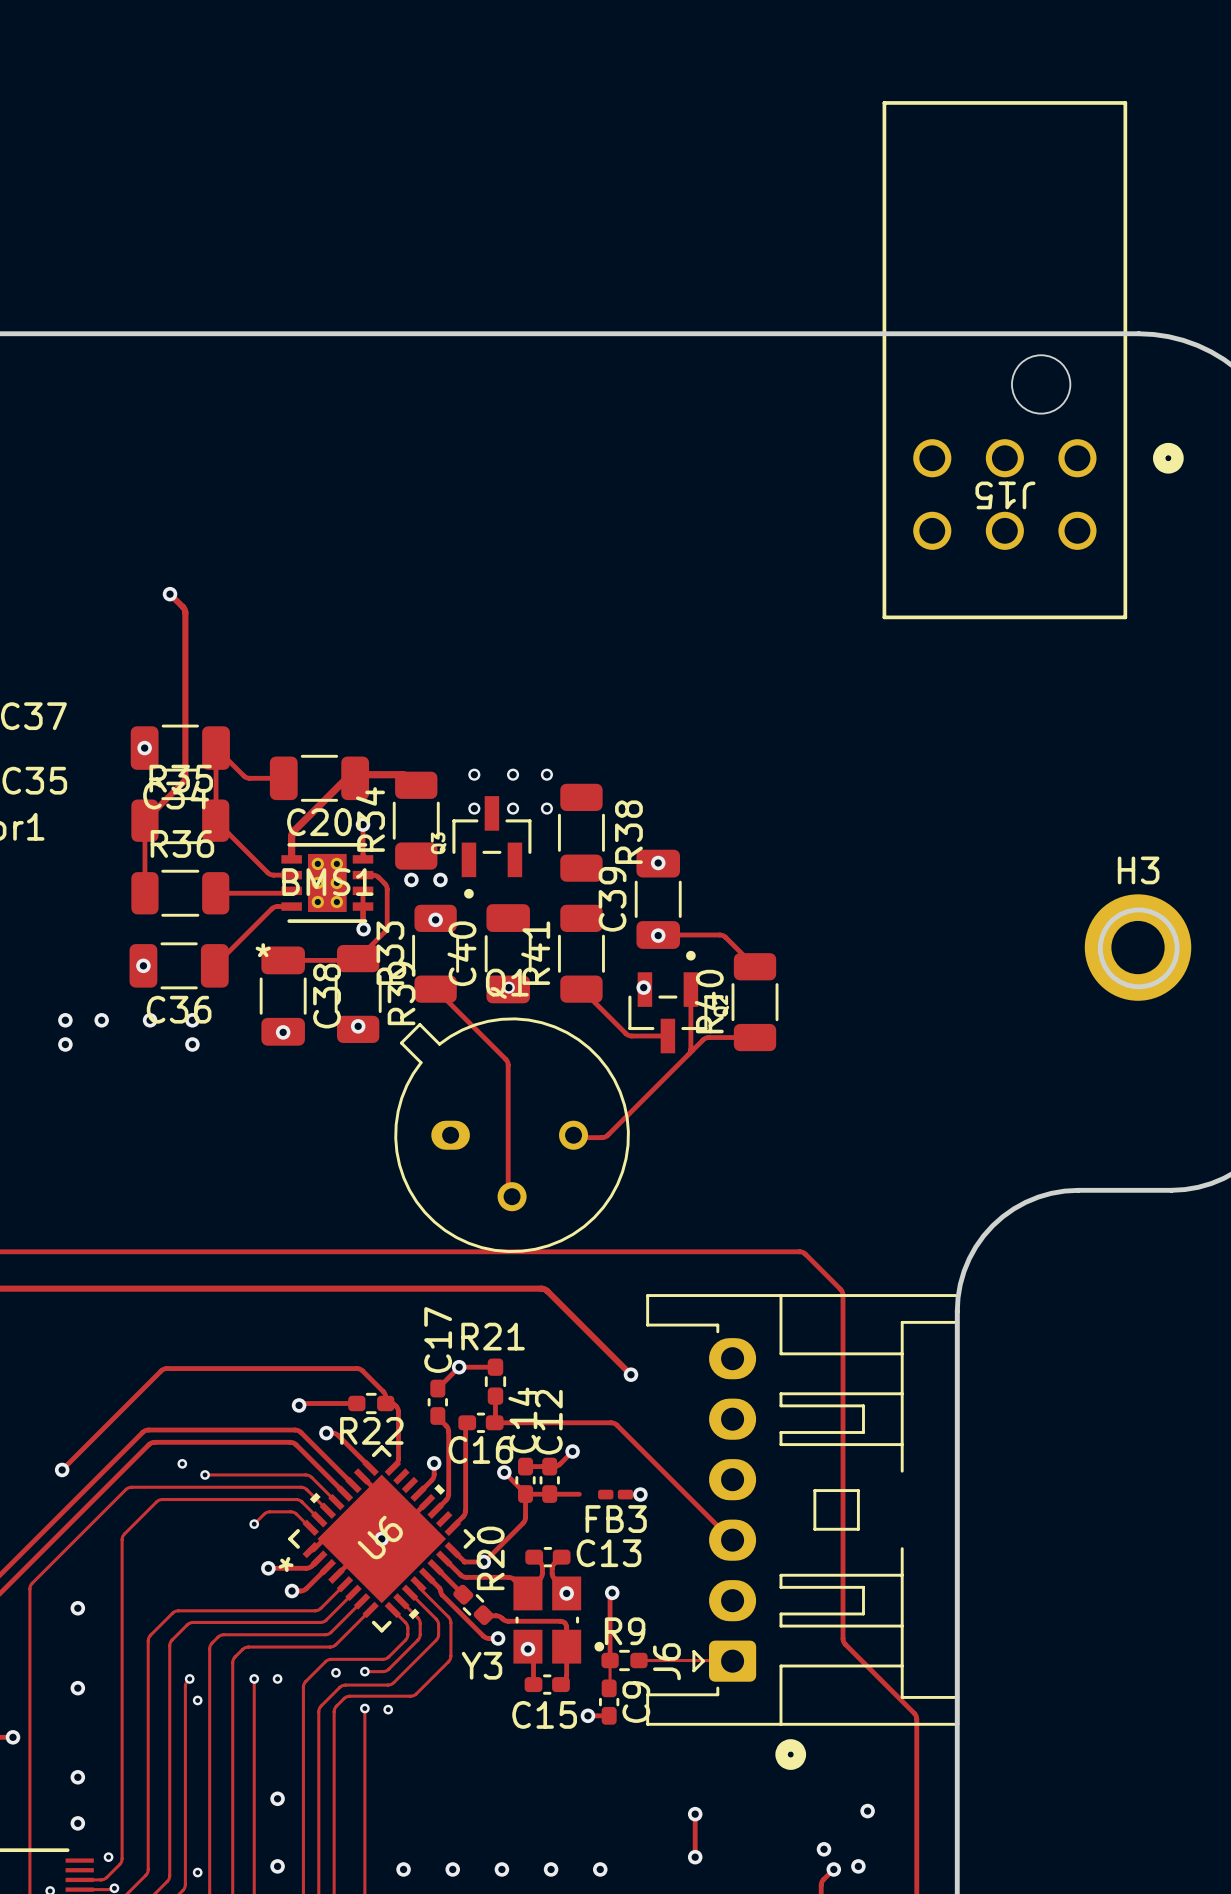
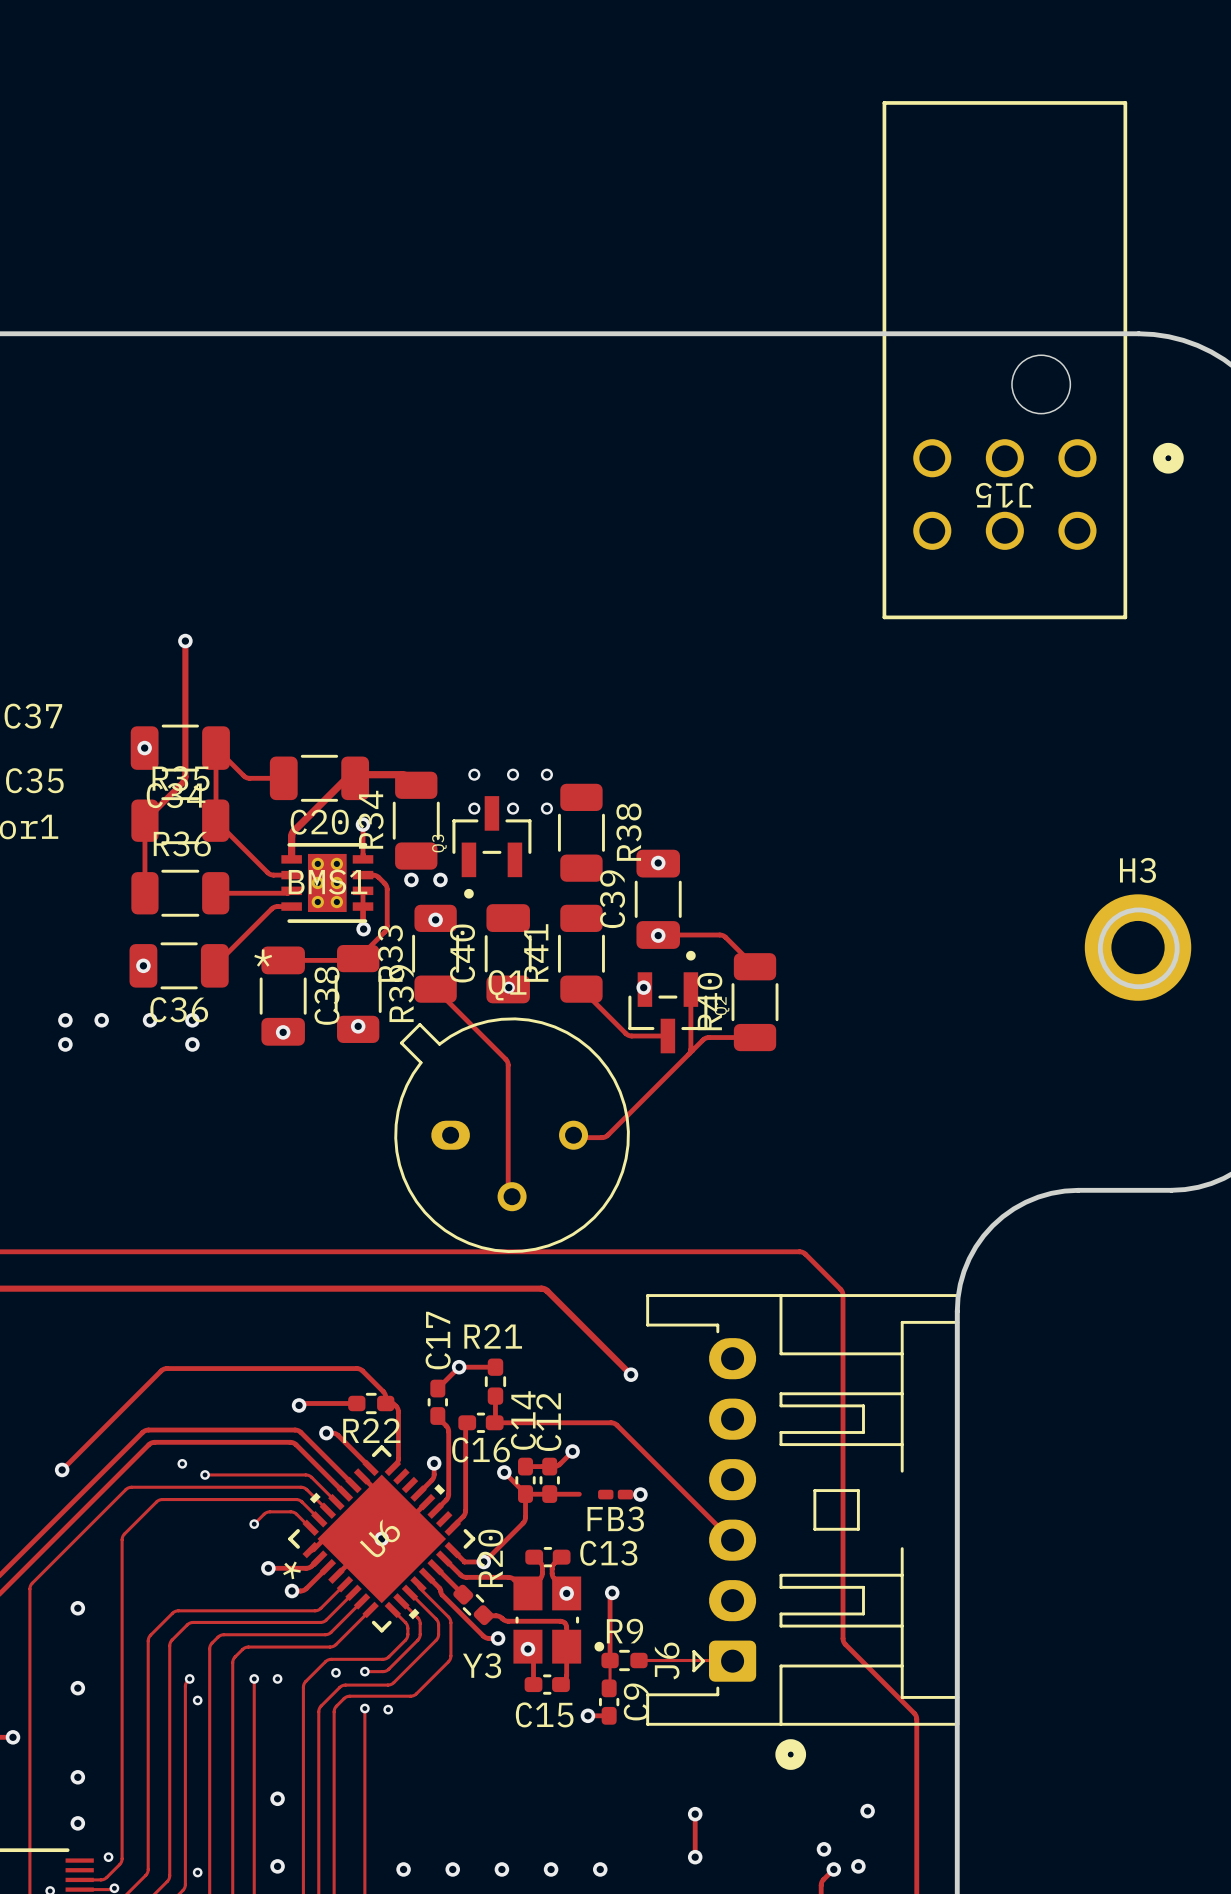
track: (170, 594) (185, 610) (185, 641) -> none
via position: (170, 594) -> (185, 641)

